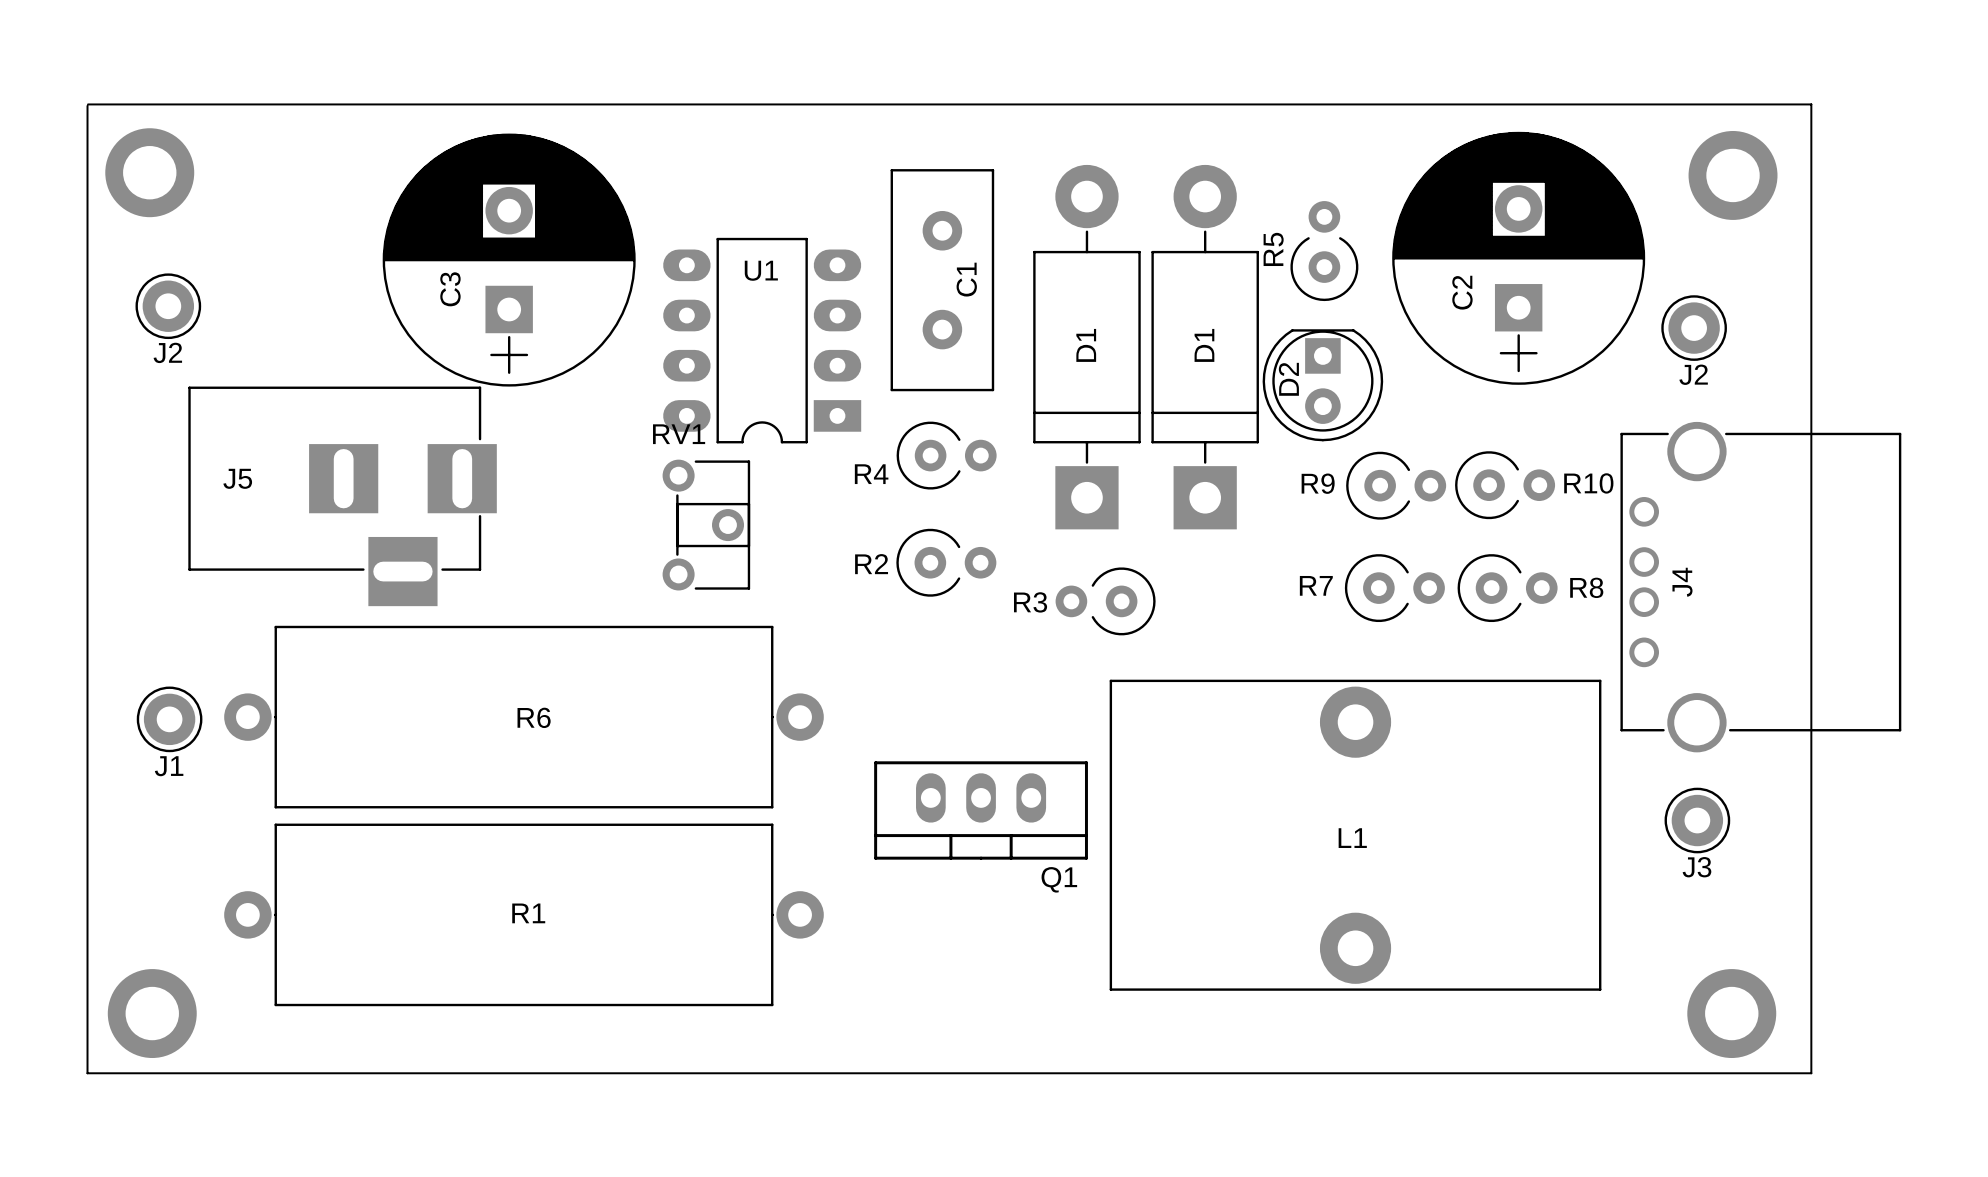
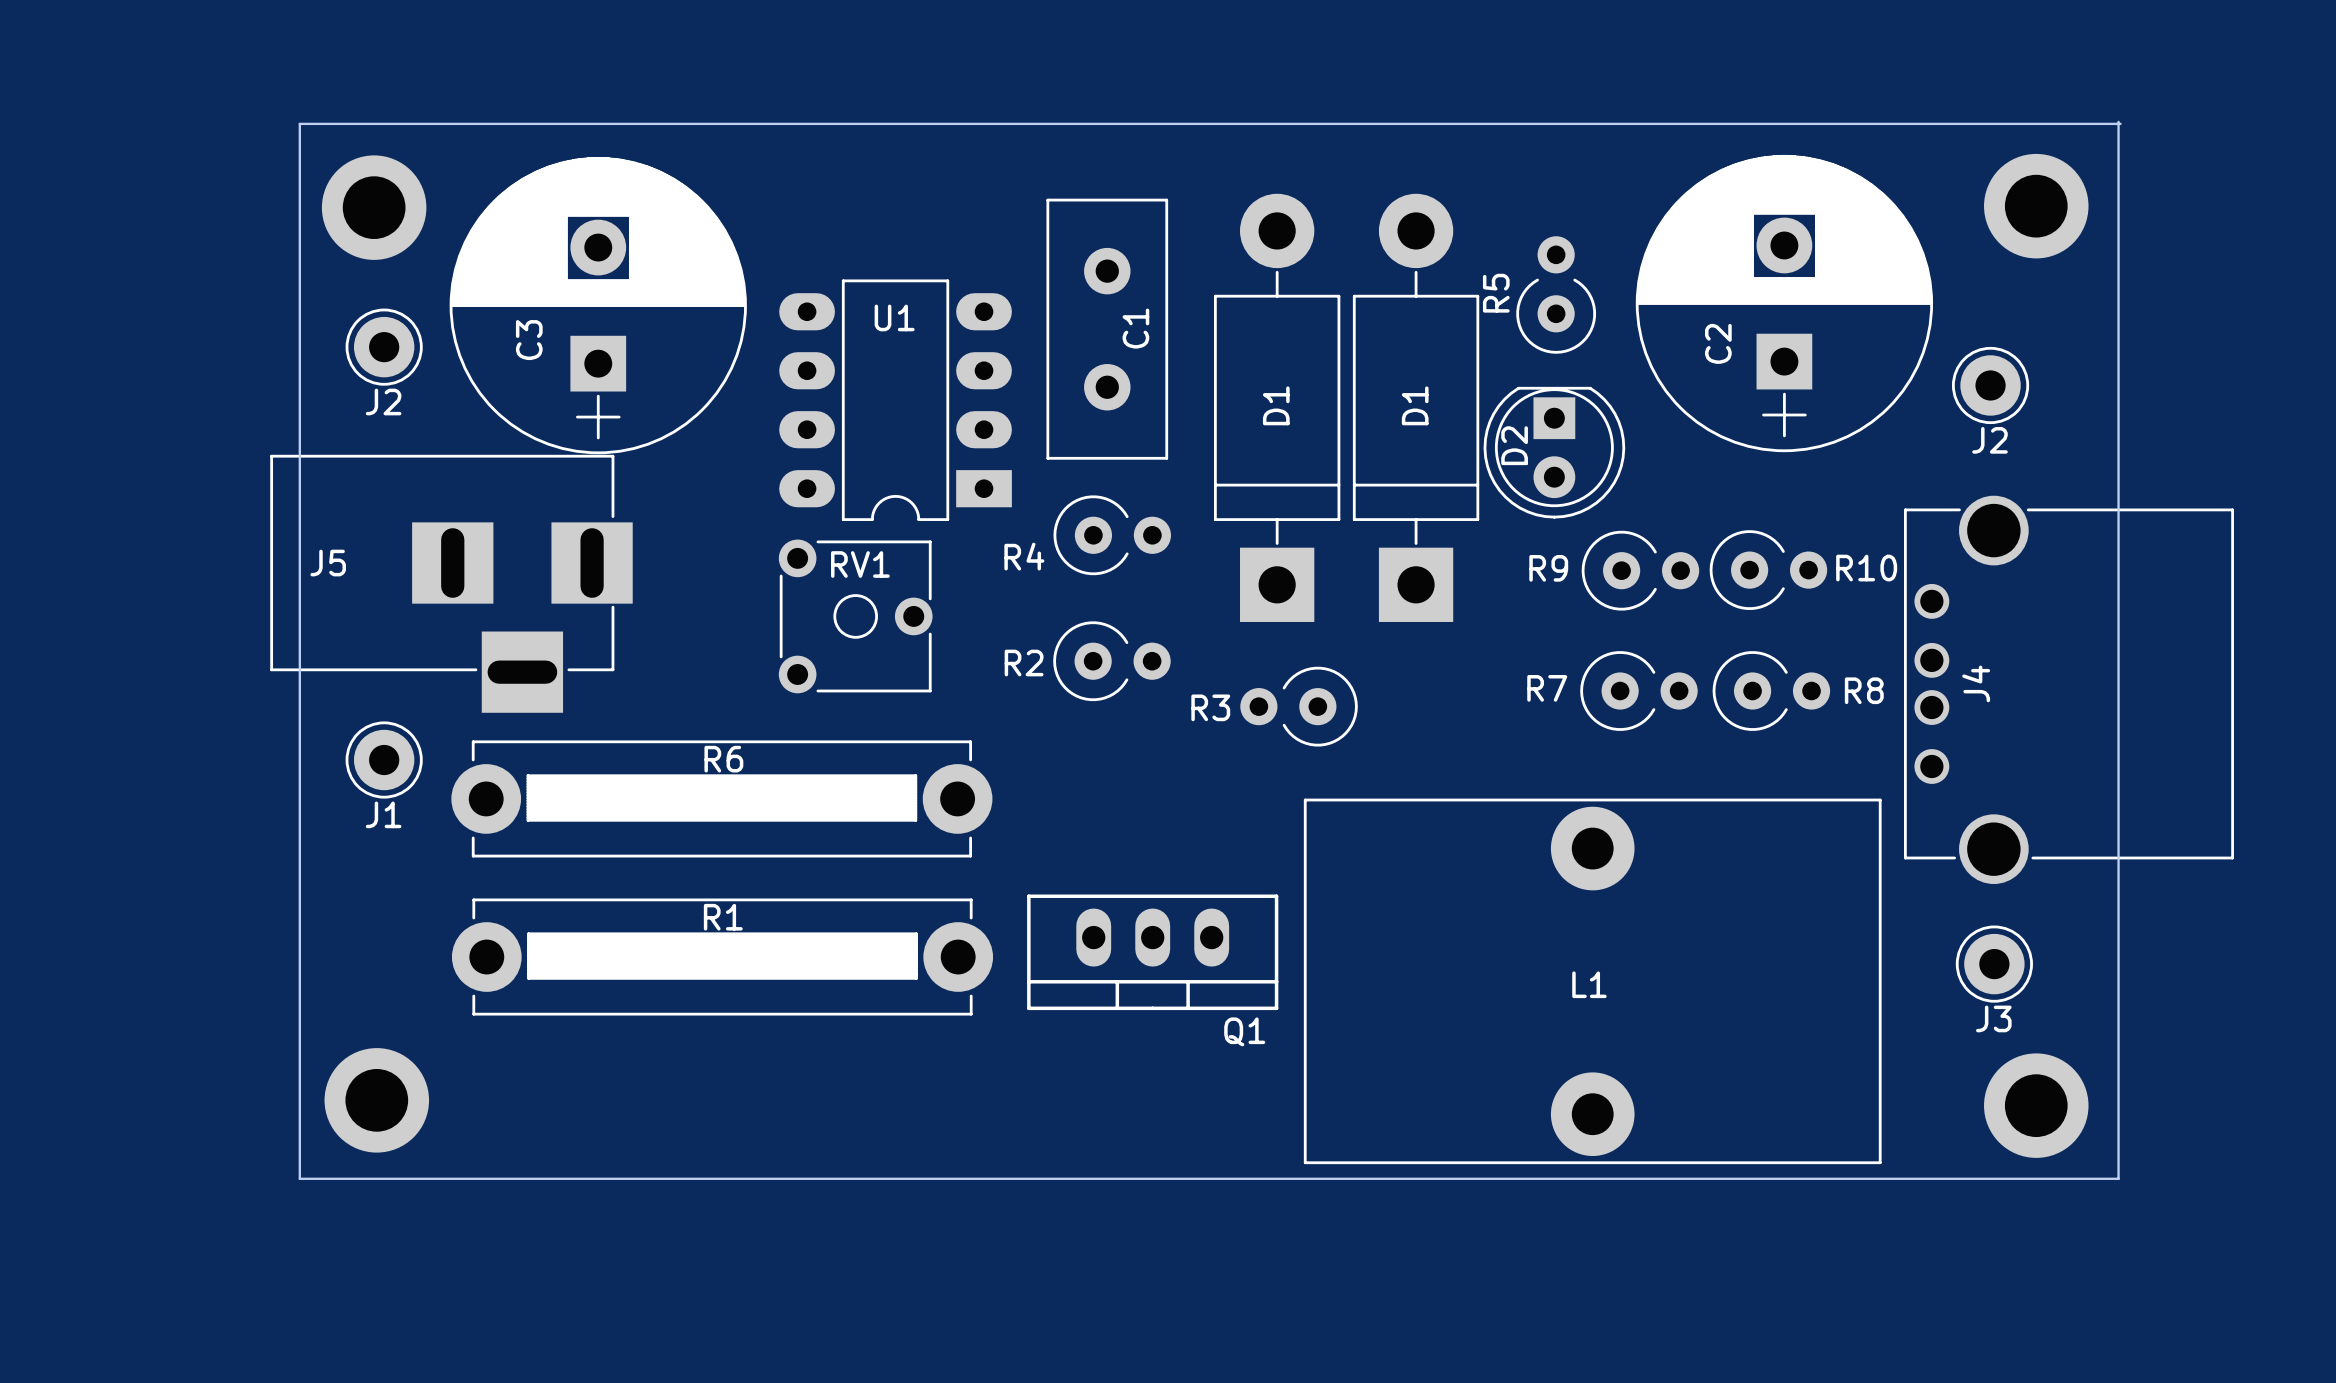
board edge: none -> (2118, 121) (2118, 1178) (299, 1178) (299, 123) (2120, 123)
board edge: (88, 104) (1811, 104) (1811, 1073) (87, 1073) (87, 105) -> none
part position: (149, 172) -> (374, 207)
J2 position: (168, 306) -> (384, 347)
RV1 name position: RV1 (679, 434) -> RV1 (860, 564)
RV1 footprint: [662, 459, 751, 591] -> [778, 539, 933, 694]
J5 position: (342, 496) -> (451, 583)
R6 footprint: [224, 625, 824, 809] -> [451, 740, 993, 858]
J1 position: (169, 719) -> (384, 760)
R1 footprint: [224, 823, 824, 1007] -> [451, 898, 994, 1016]
part position: (152, 1013) -> (376, 1100)
part position: (1731, 1013) -> (2036, 1105)

